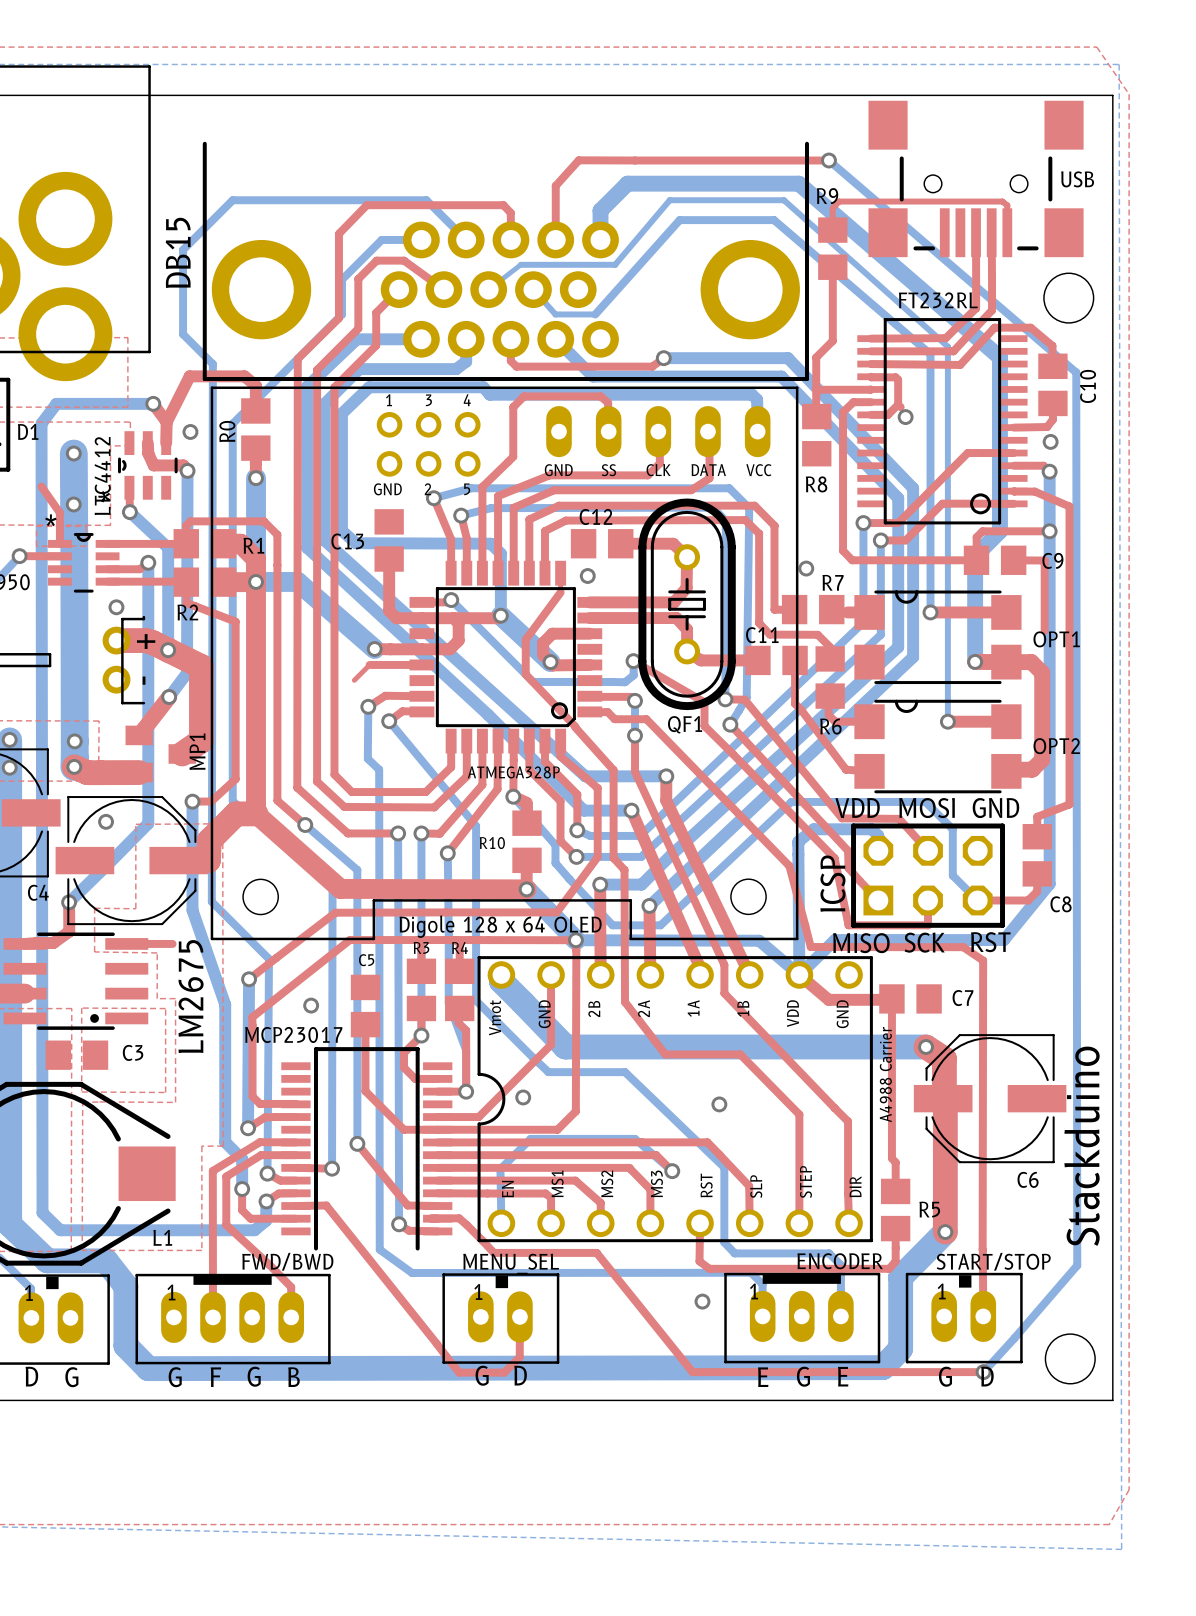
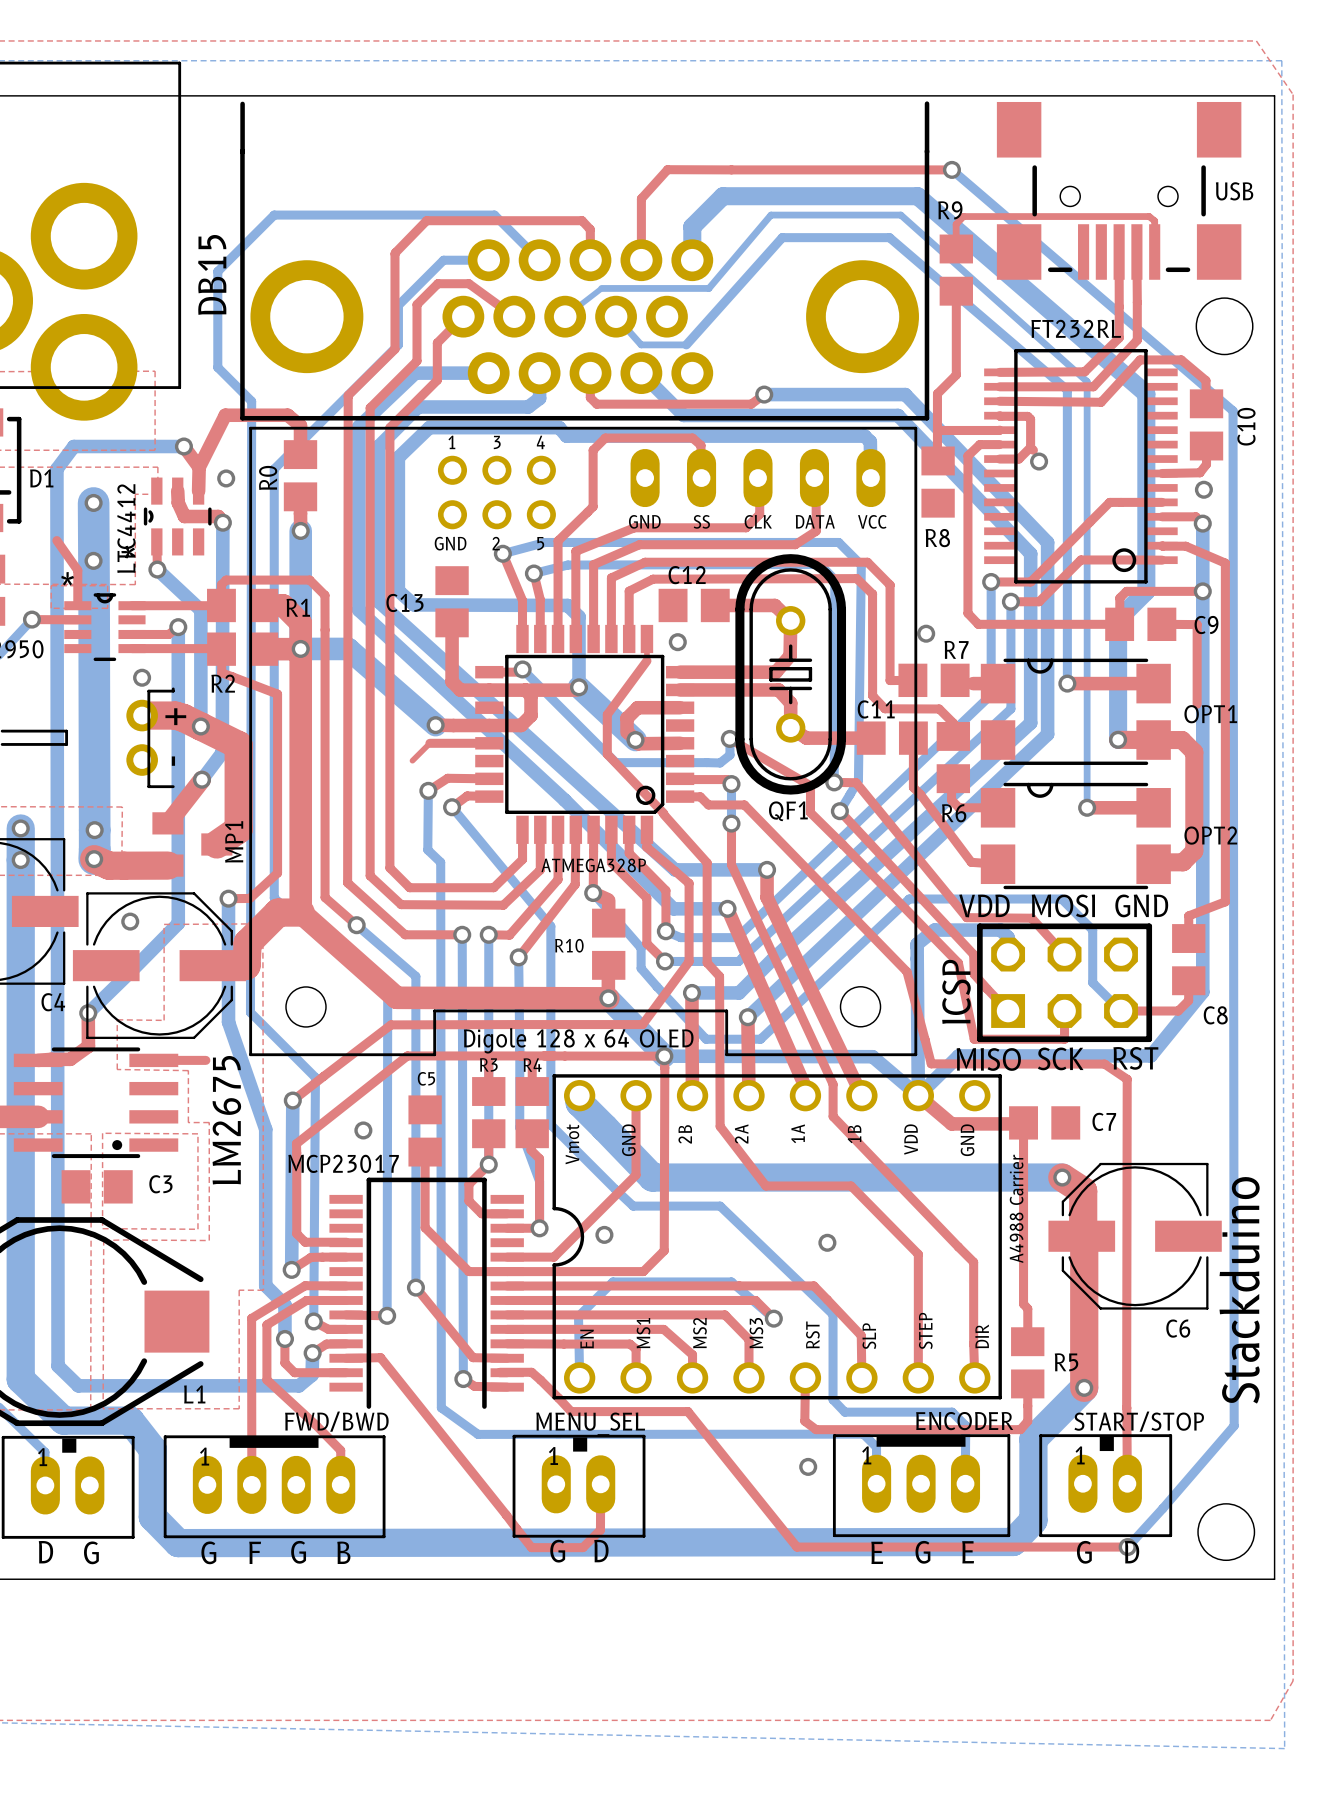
line: none -> (242, 103) (242, 152)
line: none -> (927, 103) (927, 152)

